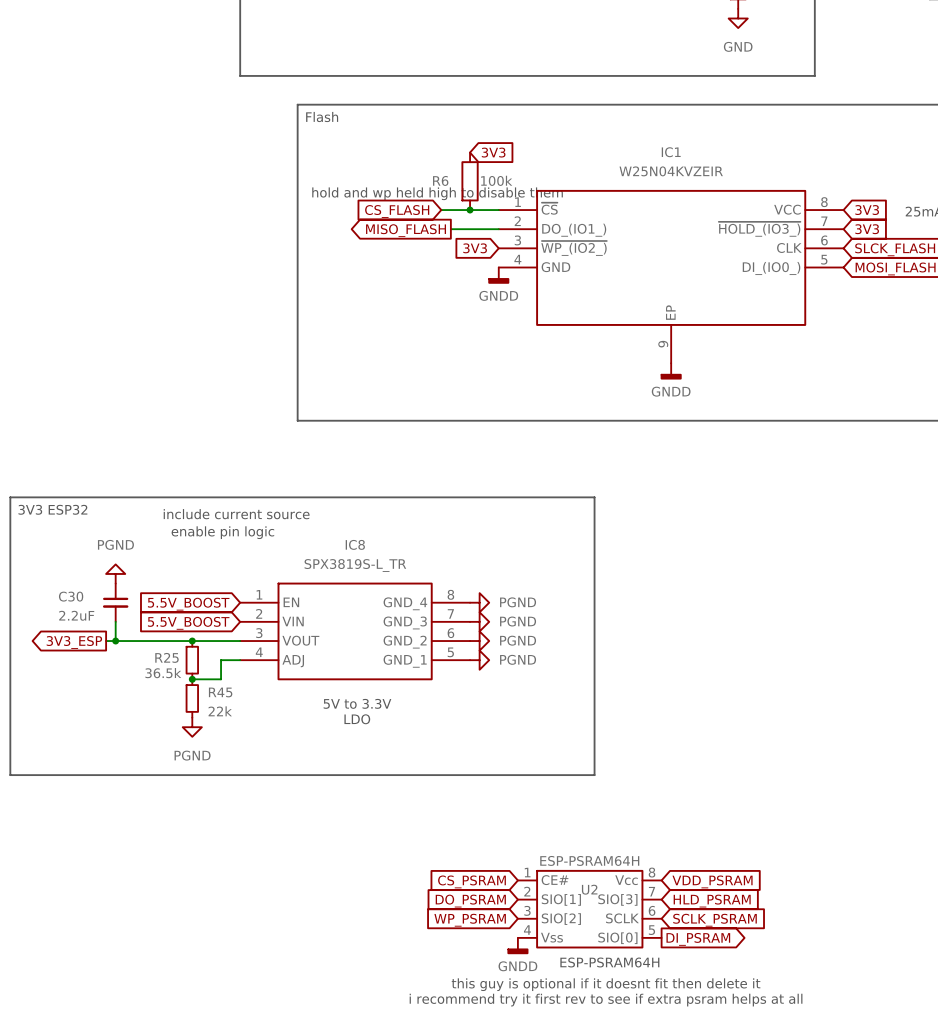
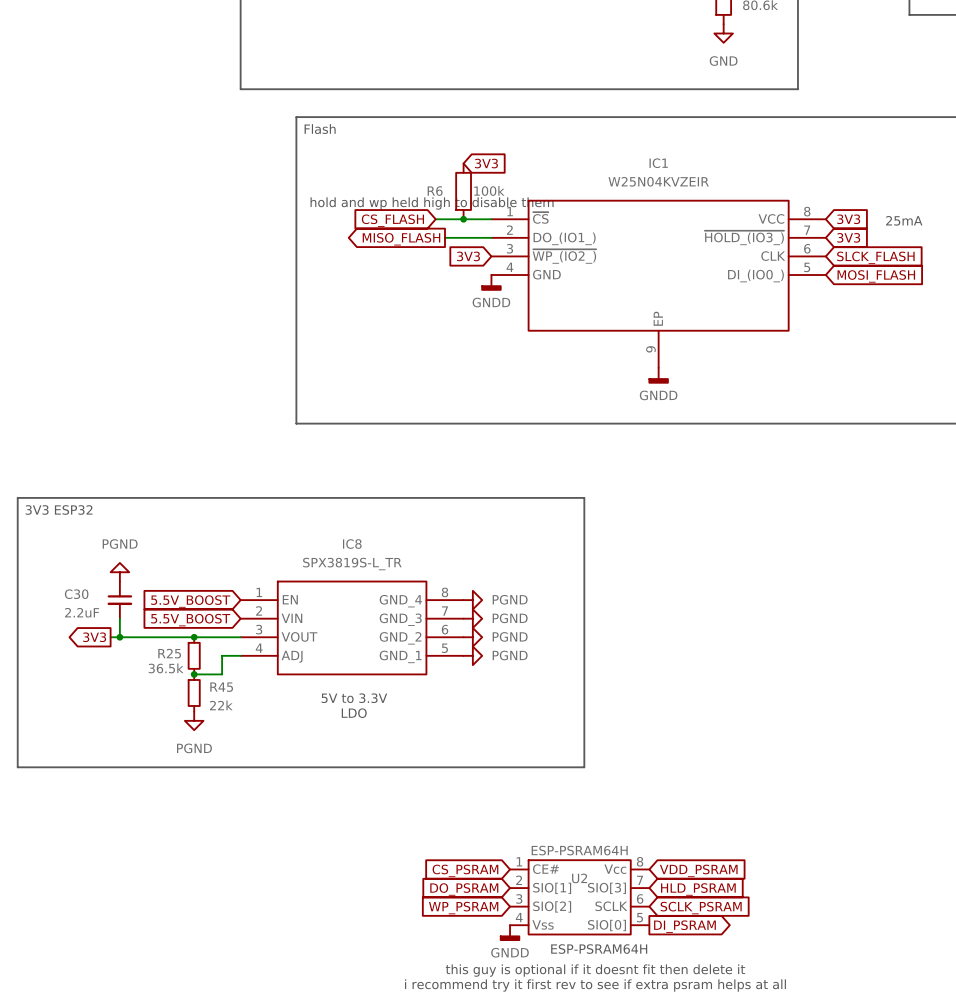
text: include current source (236, 514) -> none
text: enable pin logic (222, 532) -> none
global label: 3V3_ESP (74, 642) -> 3V3 (94, 637)

